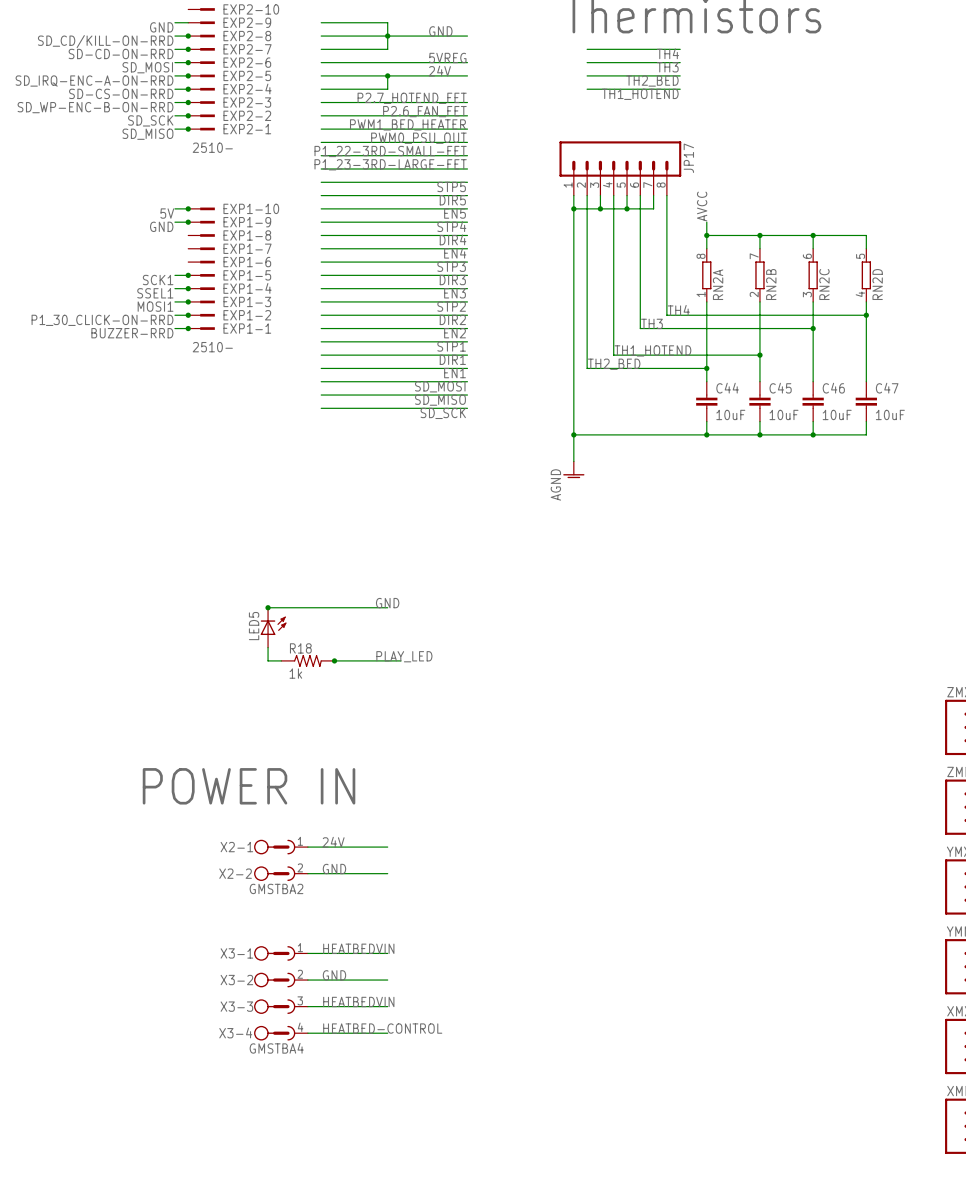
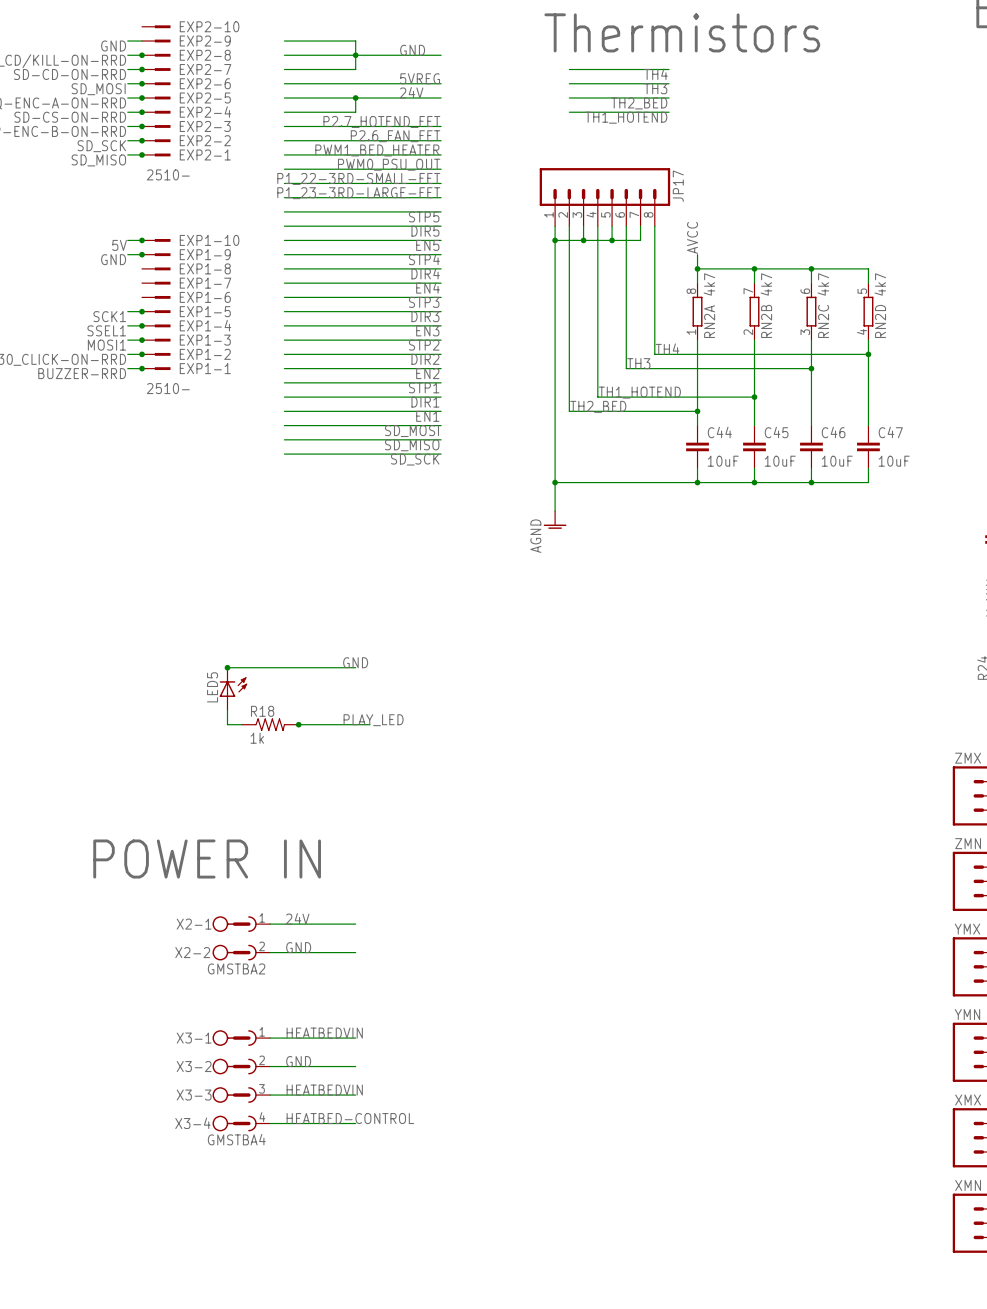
RN2A value: none -> 4k7 (709, 284)
RN2B value: none -> 4k7 (766, 284)
RN2C value: none -> 4k7 (823, 284)
RN2D value: none -> 4k7 (880, 284)

